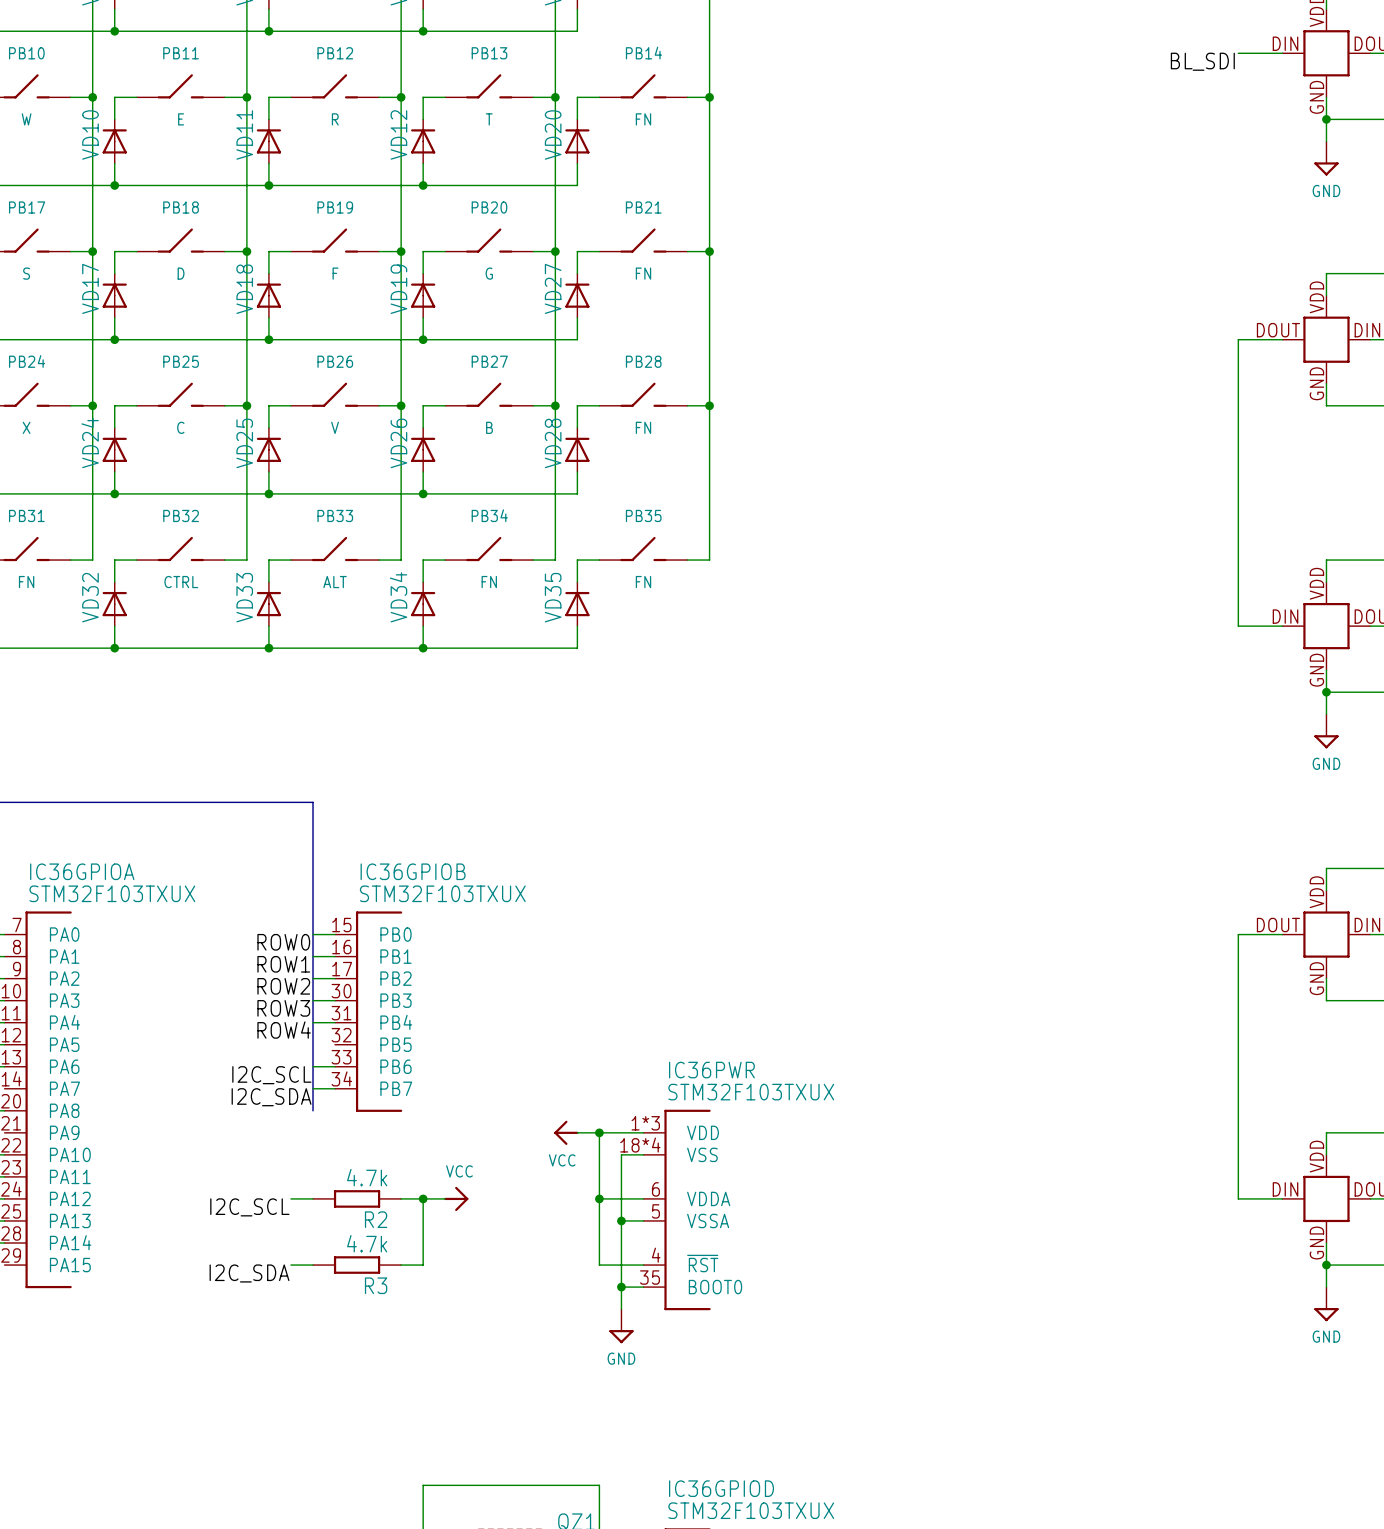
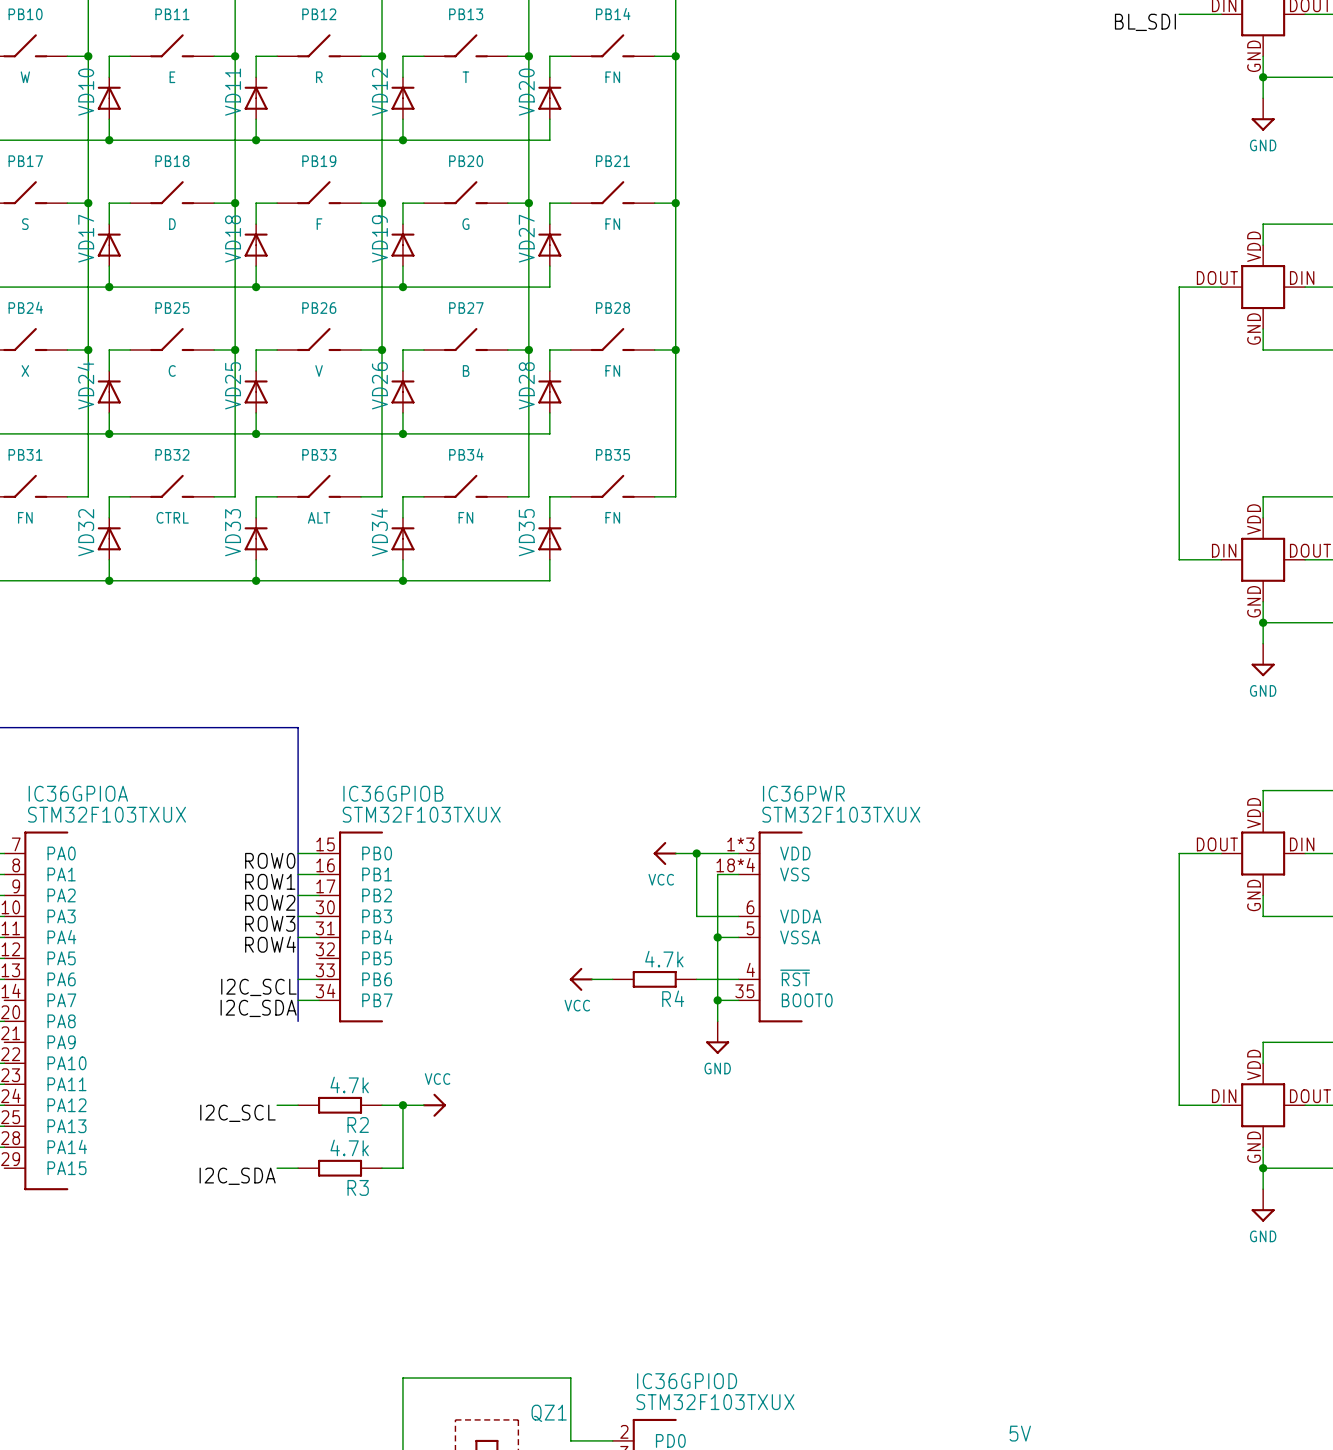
power symbol: none -> VCC (665, 853)
wire: none -> (675, 853) (738, 853)
wire: none -> (696, 853) (696, 916) (738, 916)
junction: none -> (696, 853)
wire: none -> (738, 874) (717, 874) (717, 1021)
wire: none -> (717, 937) (738, 937)
junction: none -> (717, 937)
wire: none -> (591, 979) (612, 979)
R4: none -> 4.7k (654, 979)
junction: none -> (717, 1000)
power symbol: none -> GND (717, 1037)
power symbol position: VCC (566, 1132) -> VCC (581, 979)
wire: (577, 1132) (643, 1132) -> none
wire: (599, 1132) (599, 1265) (643, 1265) -> none
junction: (599, 1132) -> none
wire: (643, 1154) (621, 1154) (621, 1309) -> none
wire: (599, 1198) (643, 1198) -> (696, 979) (738, 979)
junction: (599, 1198) -> none
IC36PWR position: (677, 1209) -> (770, 926)
wire: (621, 1220) (643, 1220) -> (717, 1000) (738, 1000)
junction: (621, 1220) -> none
wire: (621, 1287) (643, 1287) -> none
junction: (621, 1287) -> none
power symbol: GND (621, 1326) -> none

